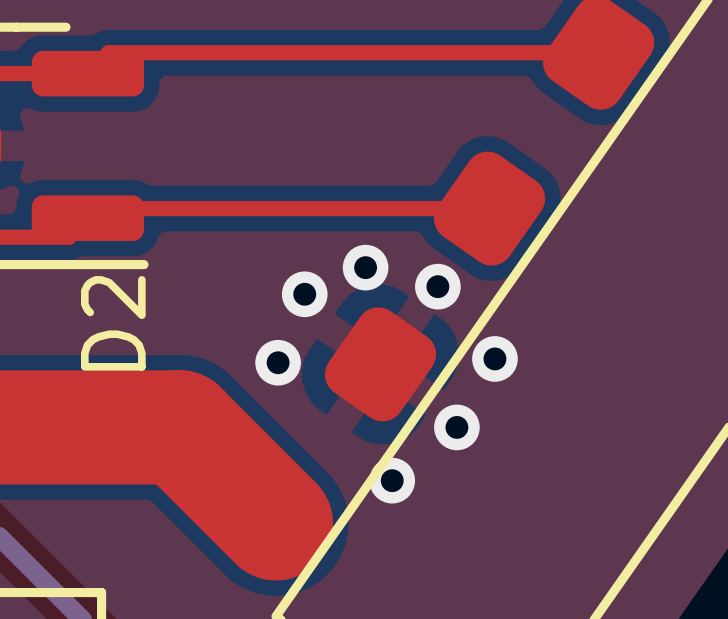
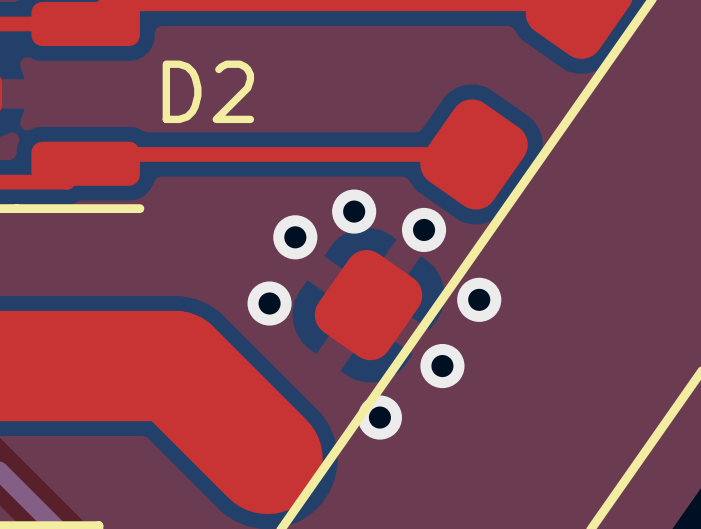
D2 name rotation: 0° (113, 323) -> 90° clockwise (208, 91)
D2 name position: D2 (113, 323) -> D2 (208, 91)

